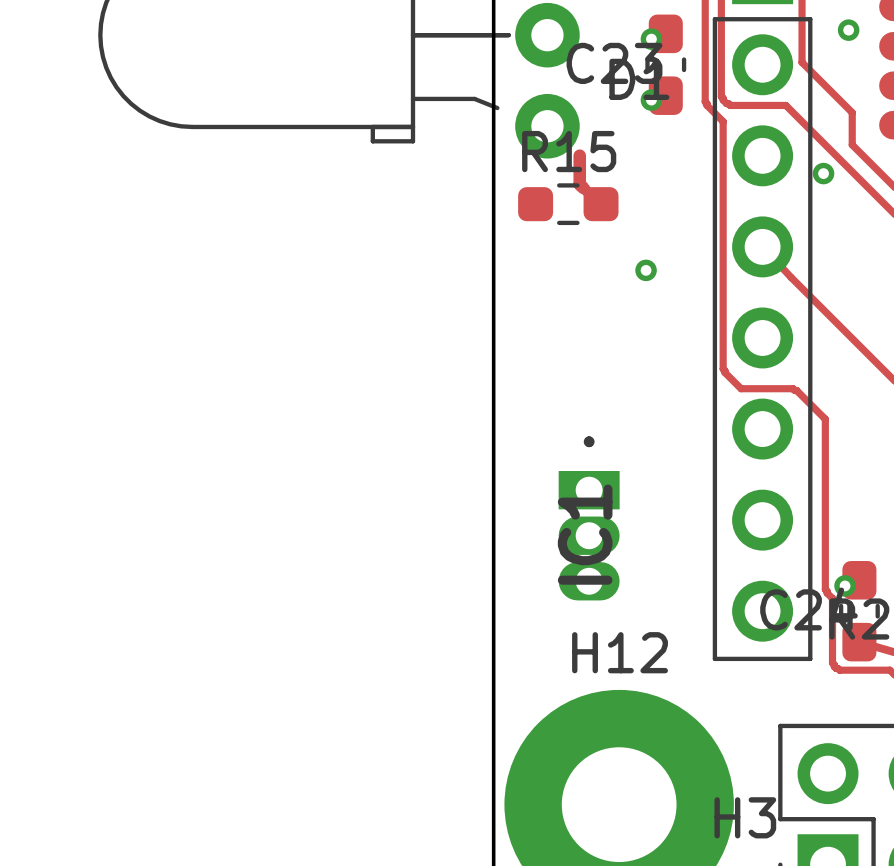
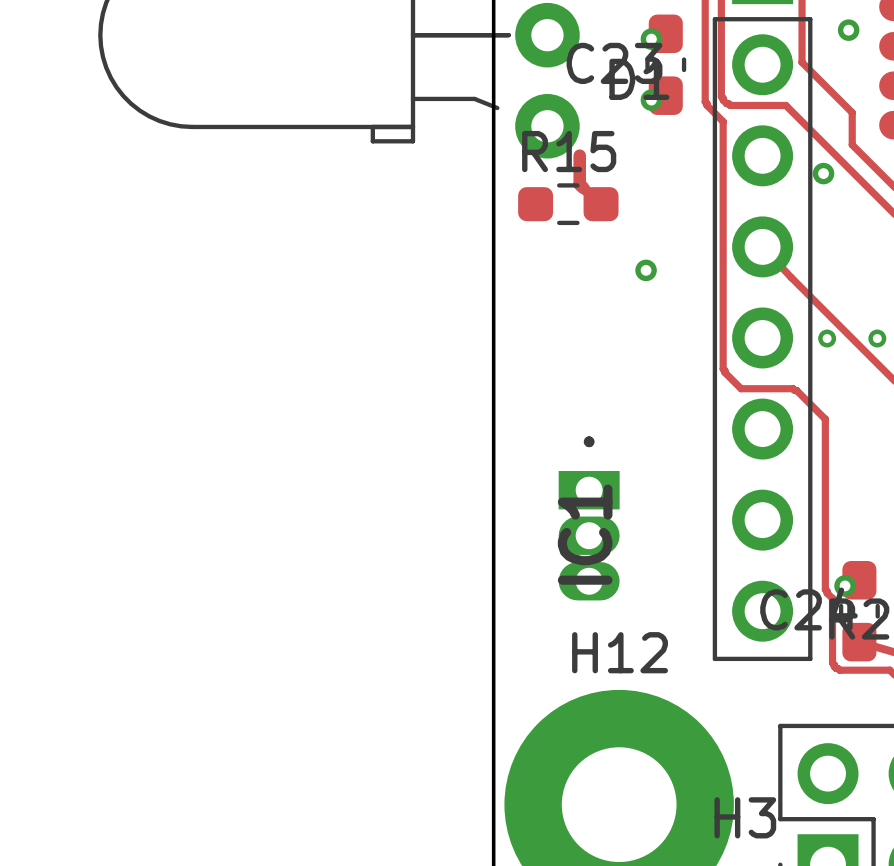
via: none -> (827, 338)
via: none -> (877, 338)

